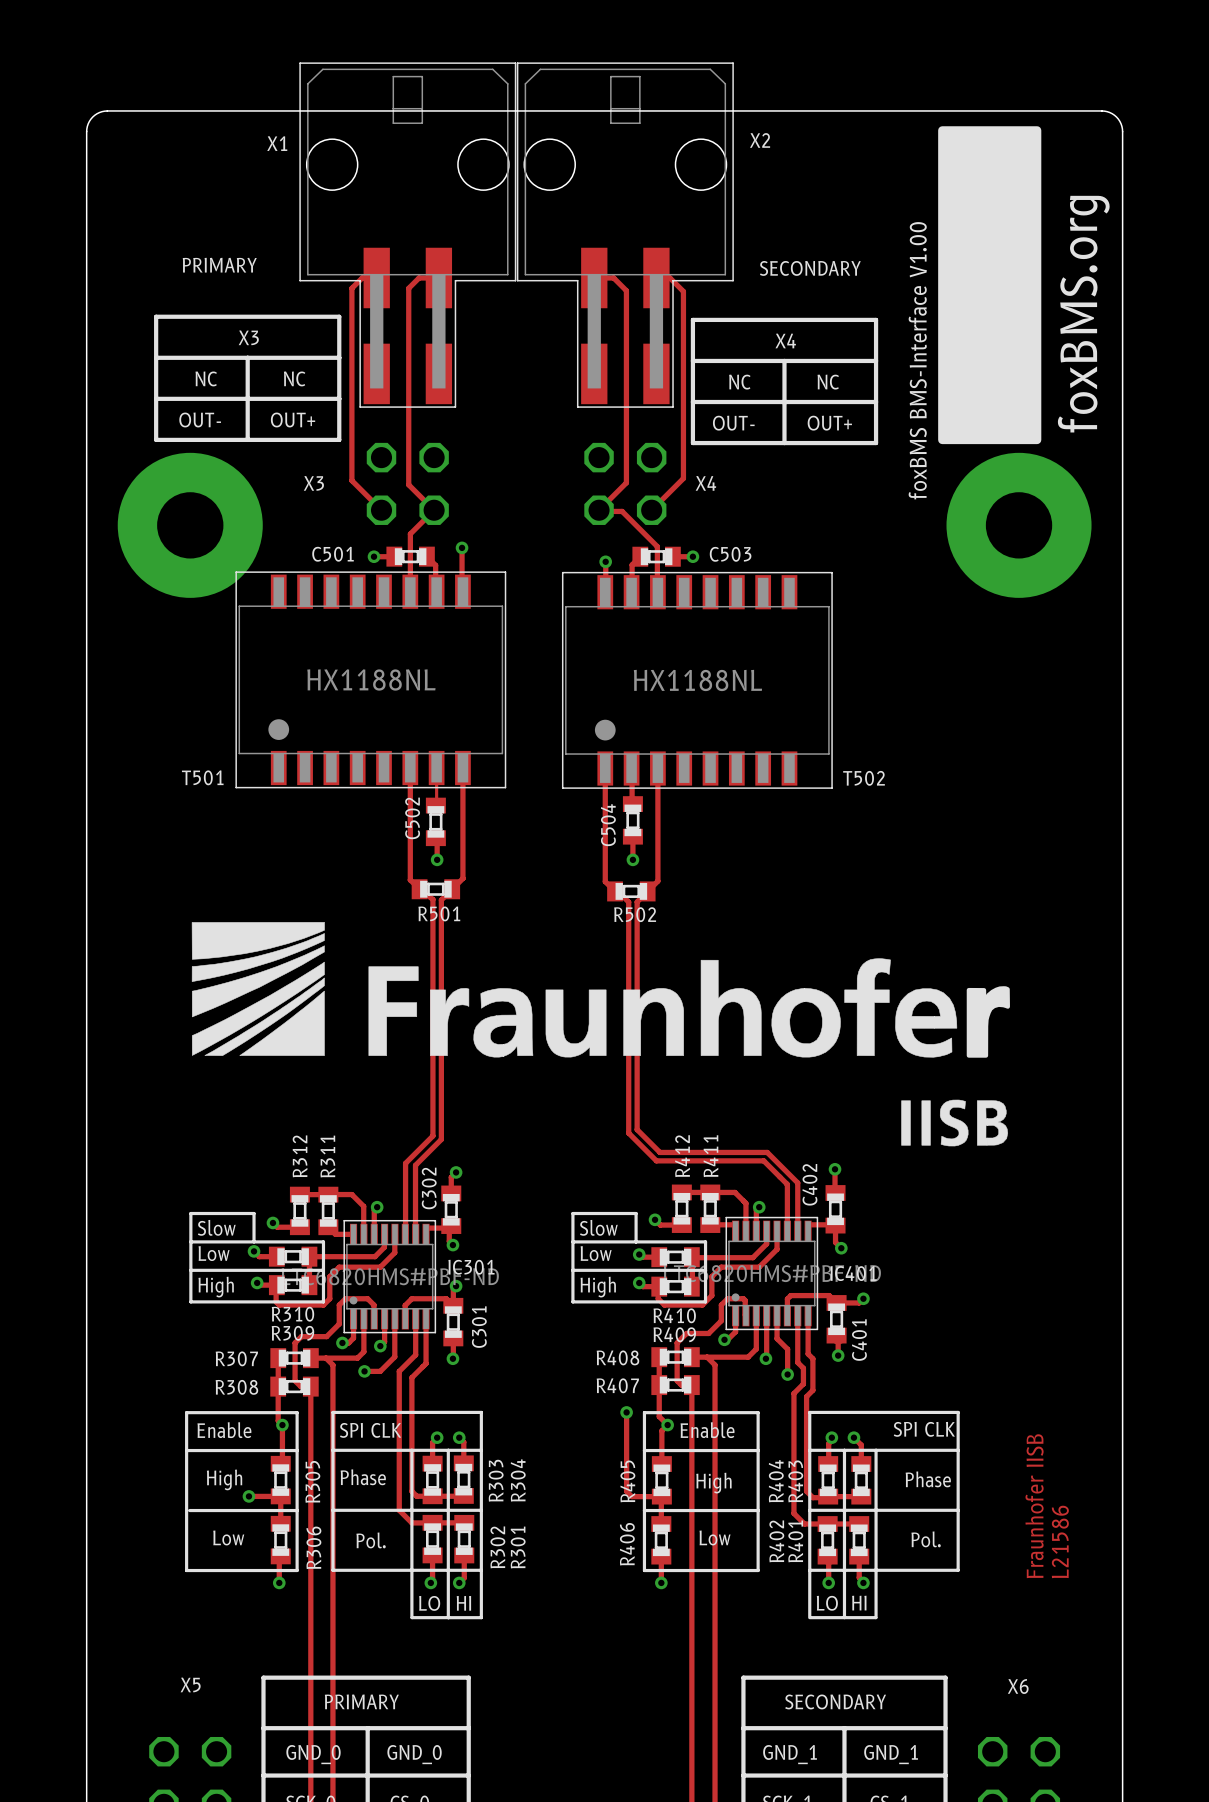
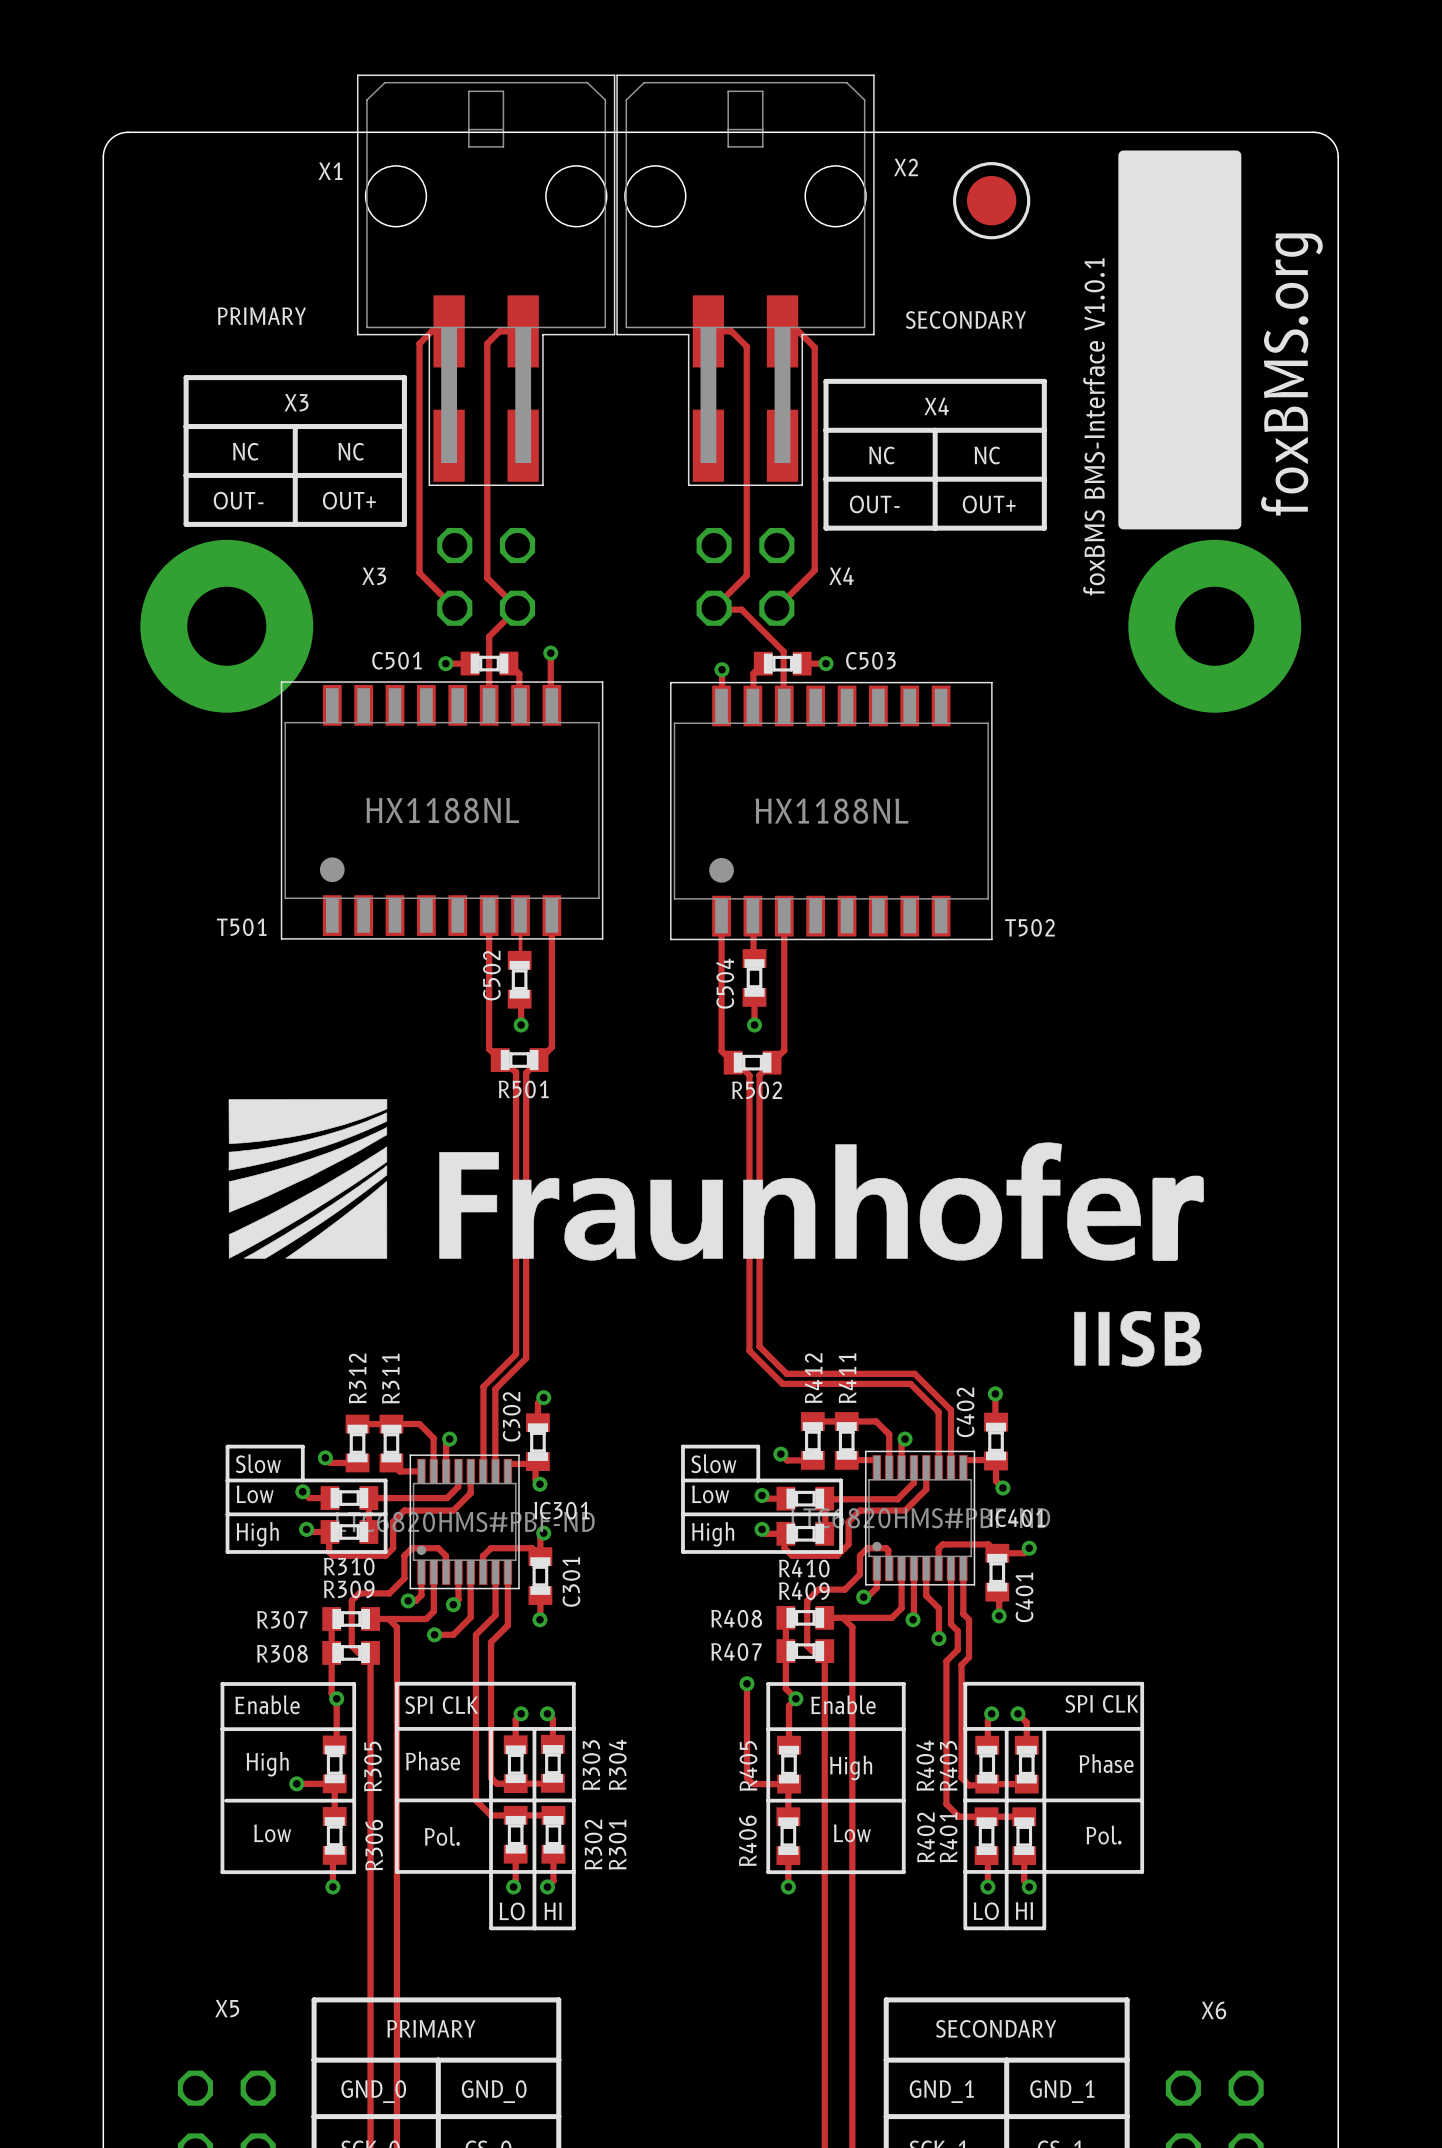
drawing: none -> [953, 162, 1031, 240]
text: foxBMS BMS-Interface V1.00 (917, 360) -> foxBMS BMS-Interface V1.0.1 (1094, 426)
text: Fraunhofer IISB (1034, 1506) -> none
text: L21586 (1060, 1541) -> none

